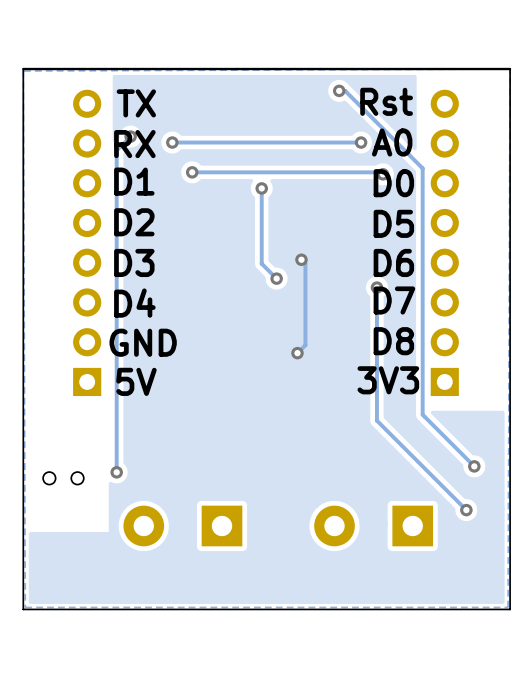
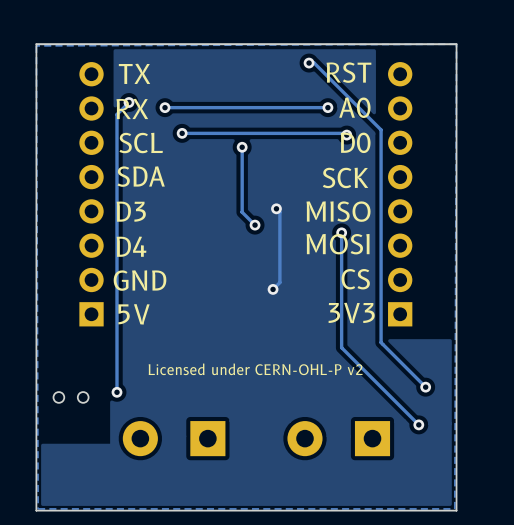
text: Rst (386, 101) -> RST (348, 72)
text: D1 (134, 181) -> SCL (141, 143)
text: D2 (134, 222) -> SDA (141, 176)
text: D5 (393, 223) -> SCK (345, 177)
text: none -> MISO (338, 211)
text: D6 (393, 262) -> none
text: none -> MOSI (338, 244)
text: D7 (394, 300) -> none
text: D8 (393, 341) -> CS (355, 279)
text: none -> Licensed under CERN-OHL-P v2 (255, 369)

